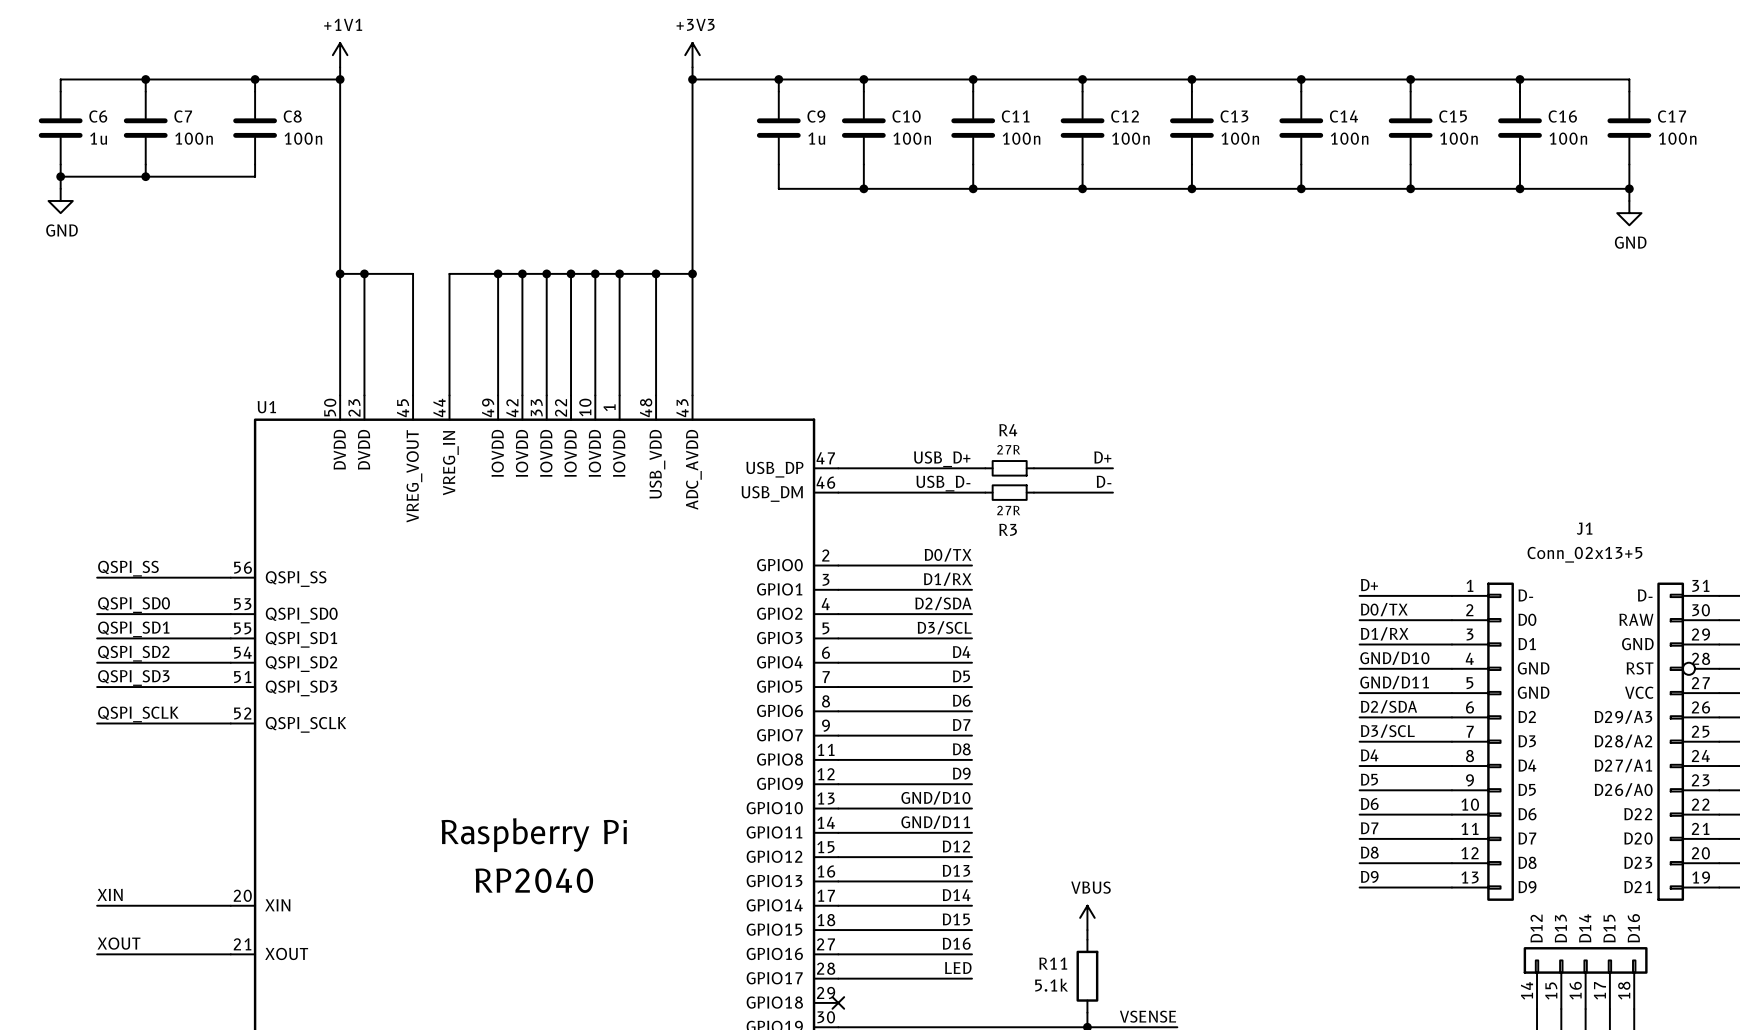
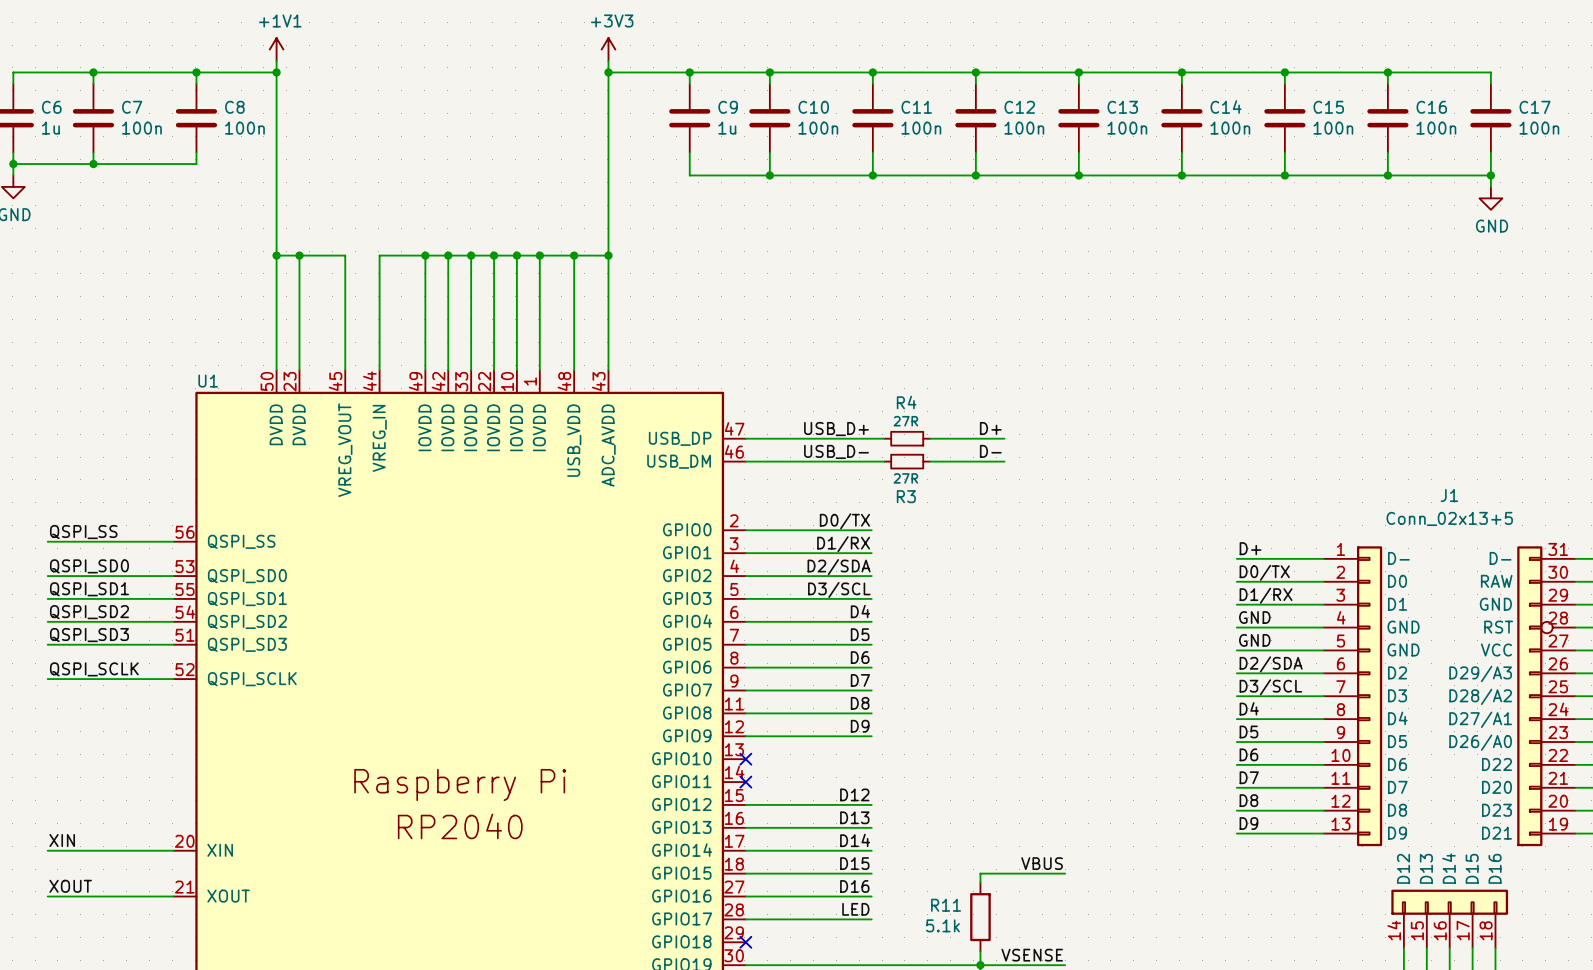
label: GND/D10 (1394, 658) -> GND (1254, 617)
label: GND/D11 (1394, 682) -> GND (1254, 640)
label: GND/D10 (935, 797) -> none
wire: (838, 808) (972, 808) -> none
no-connect mark: none -> (745, 759)
label: GND/D11 (935, 822) -> none
wire: (838, 832) (972, 832) -> none
no-connect mark: none -> (745, 782)
power symbol: VBUS (1087, 917) -> none
label: none -> VBUS (1042, 863)
wire: none -> (980, 873) (1065, 873)

